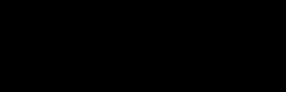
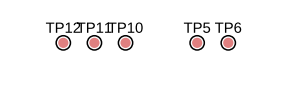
TP12: none -> (63, 42)
TP11: none -> (94, 42)
TP10: none -> (125, 42)
TP5: none -> (197, 42)
TP6: none -> (228, 42)

